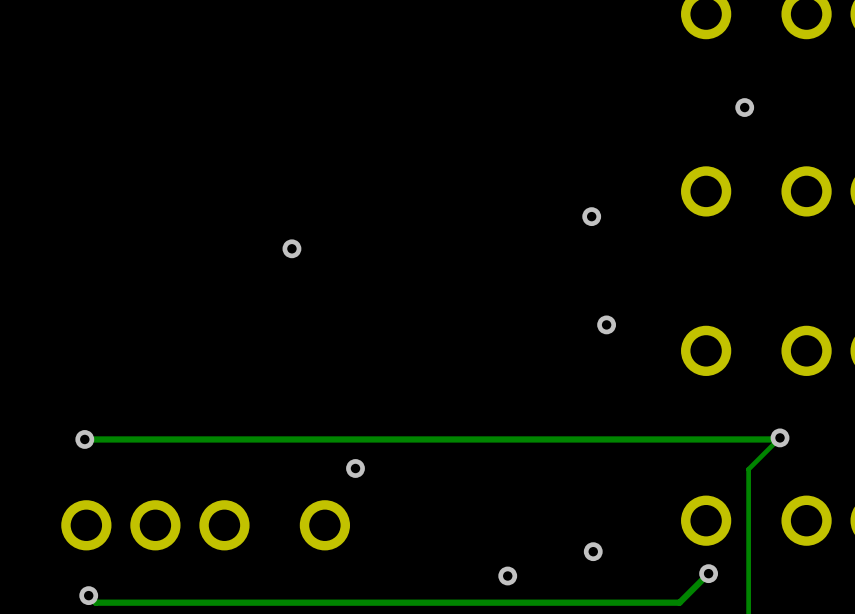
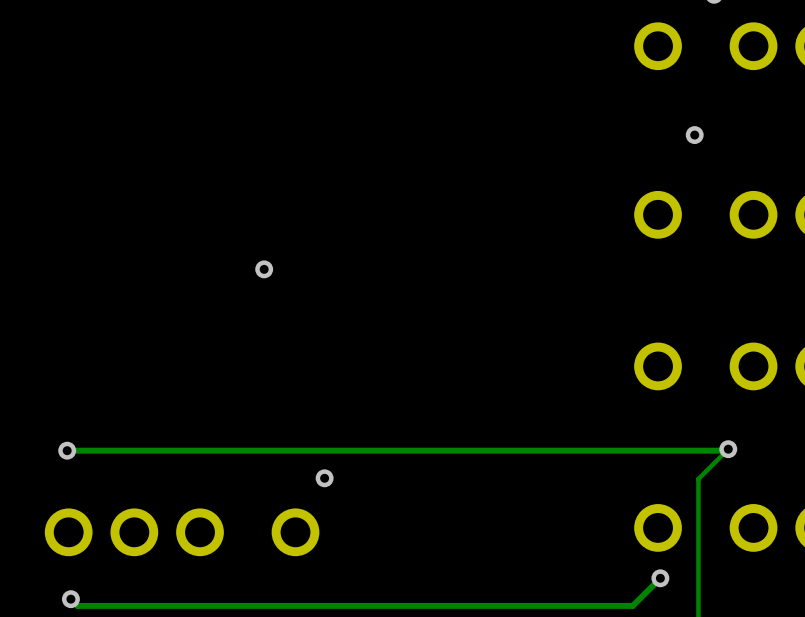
via: (591, 216) -> none
via: (606, 324) -> none
via: (593, 551) -> none
via: (507, 576) -> none

